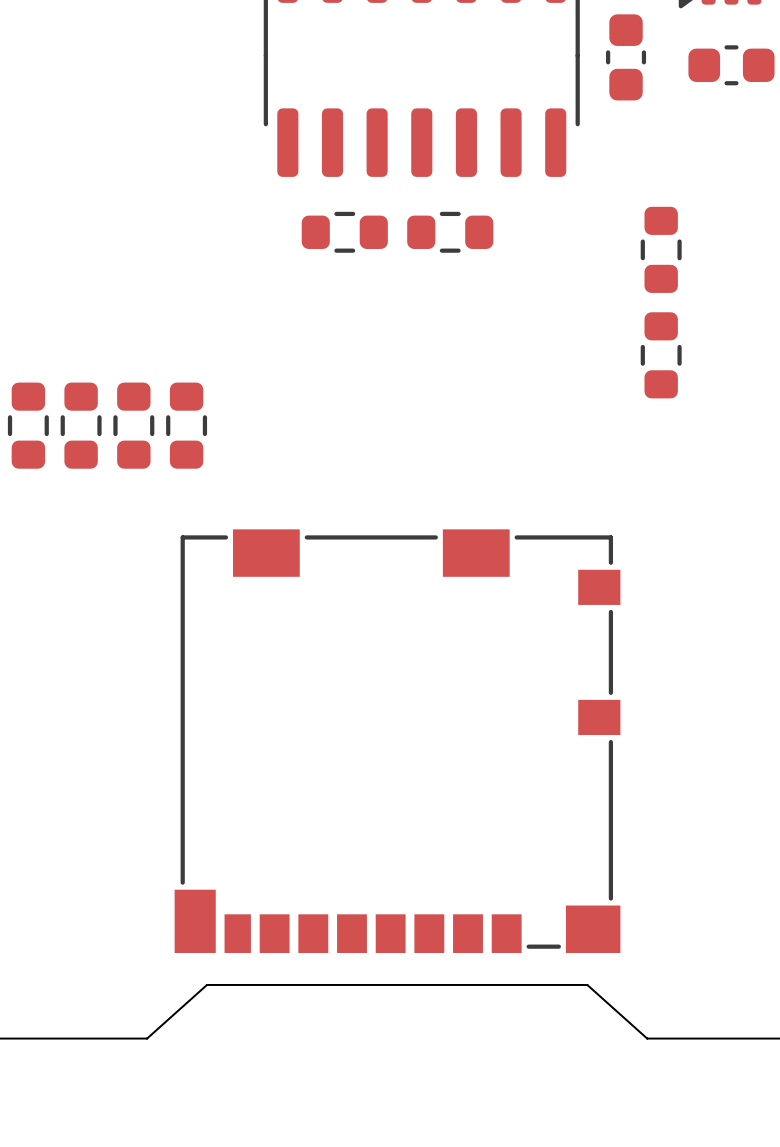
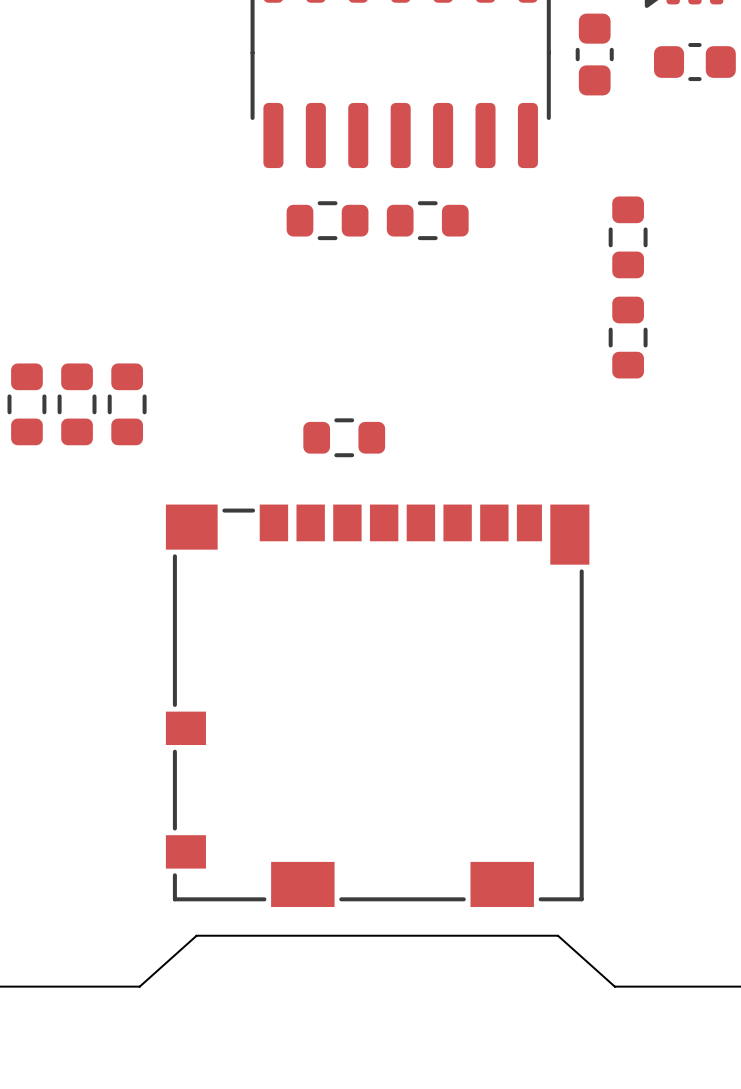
part rotation: 0° (186, 425) -> 90° clockwise (344, 437)
part position: (186, 425) -> (344, 437)
part rotation: 0° (397, 741) -> 180° (377, 705)

